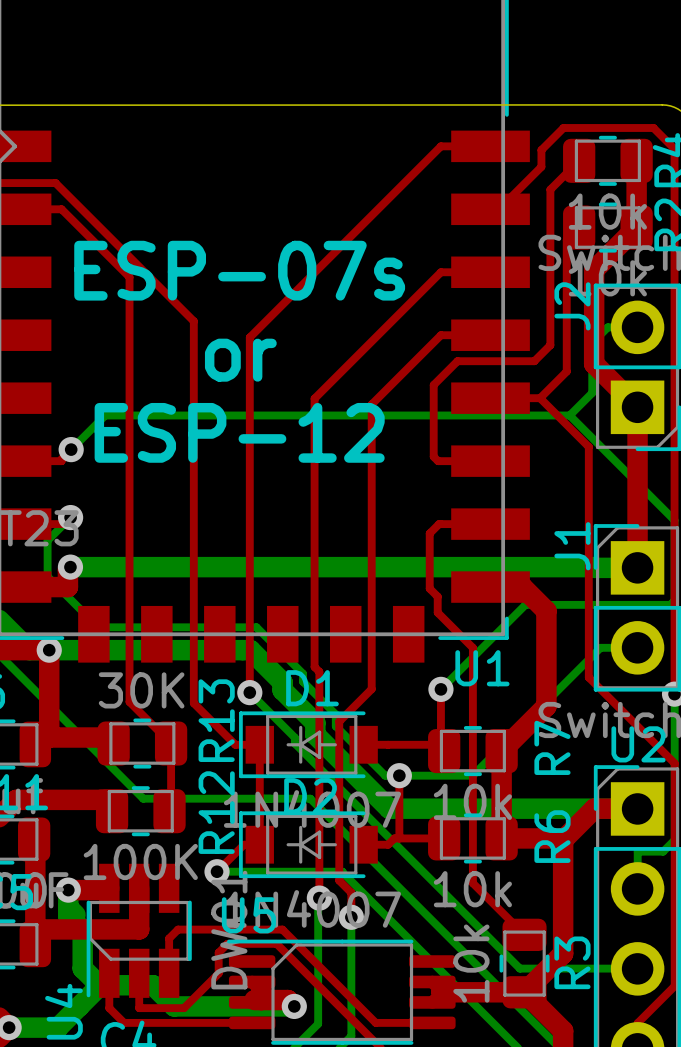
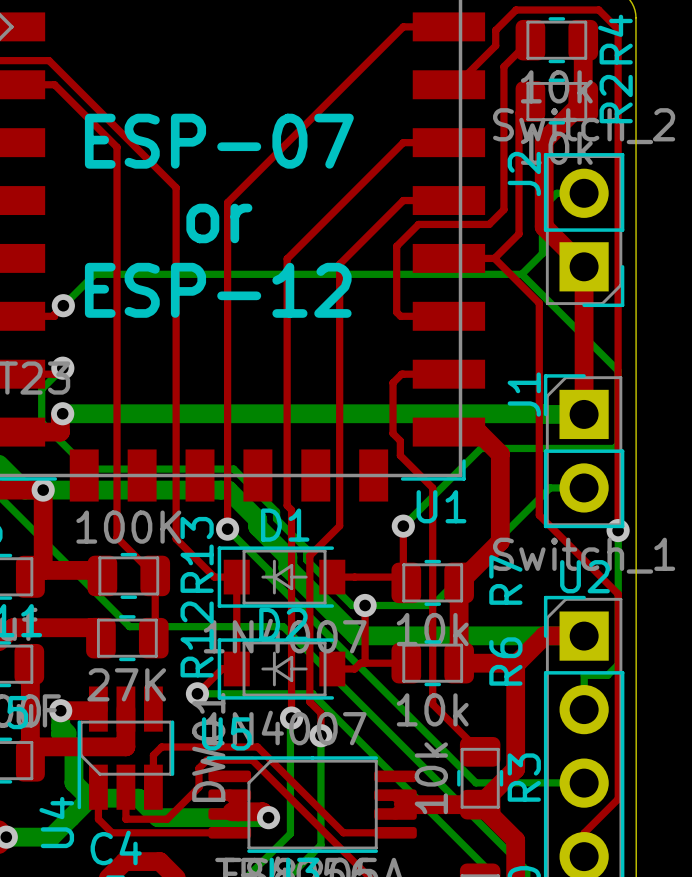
text: ESP-07s (239, 270) -> ESP-07 (219, 141)
R13 value: 30K (141, 690) -> 100K (128, 527)
R12 value: 100K (140, 861) -> 27K (126, 684)

